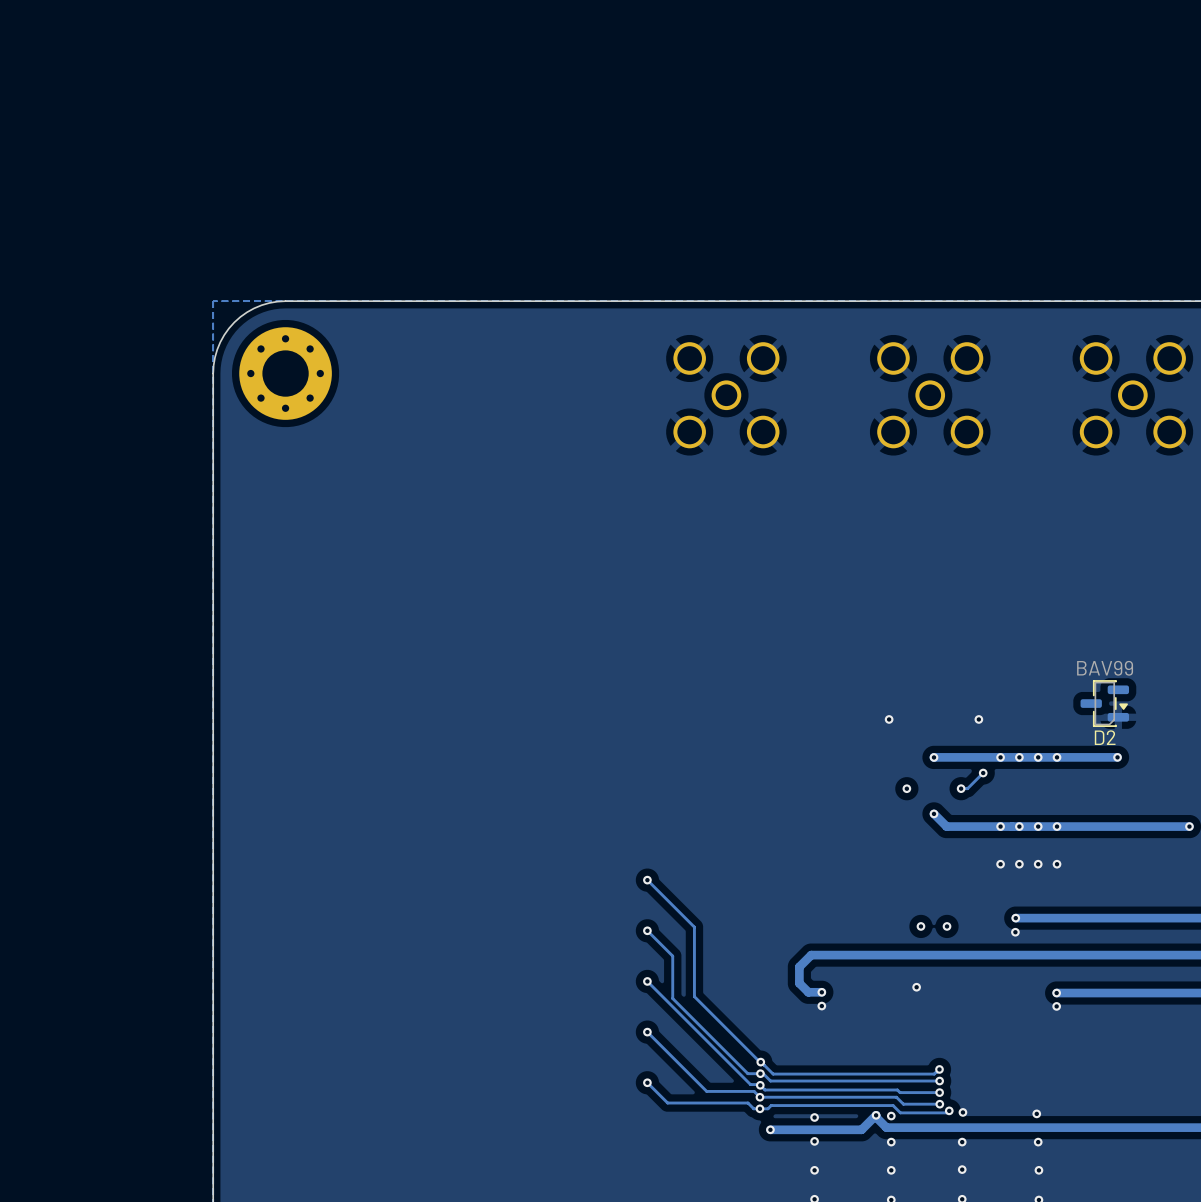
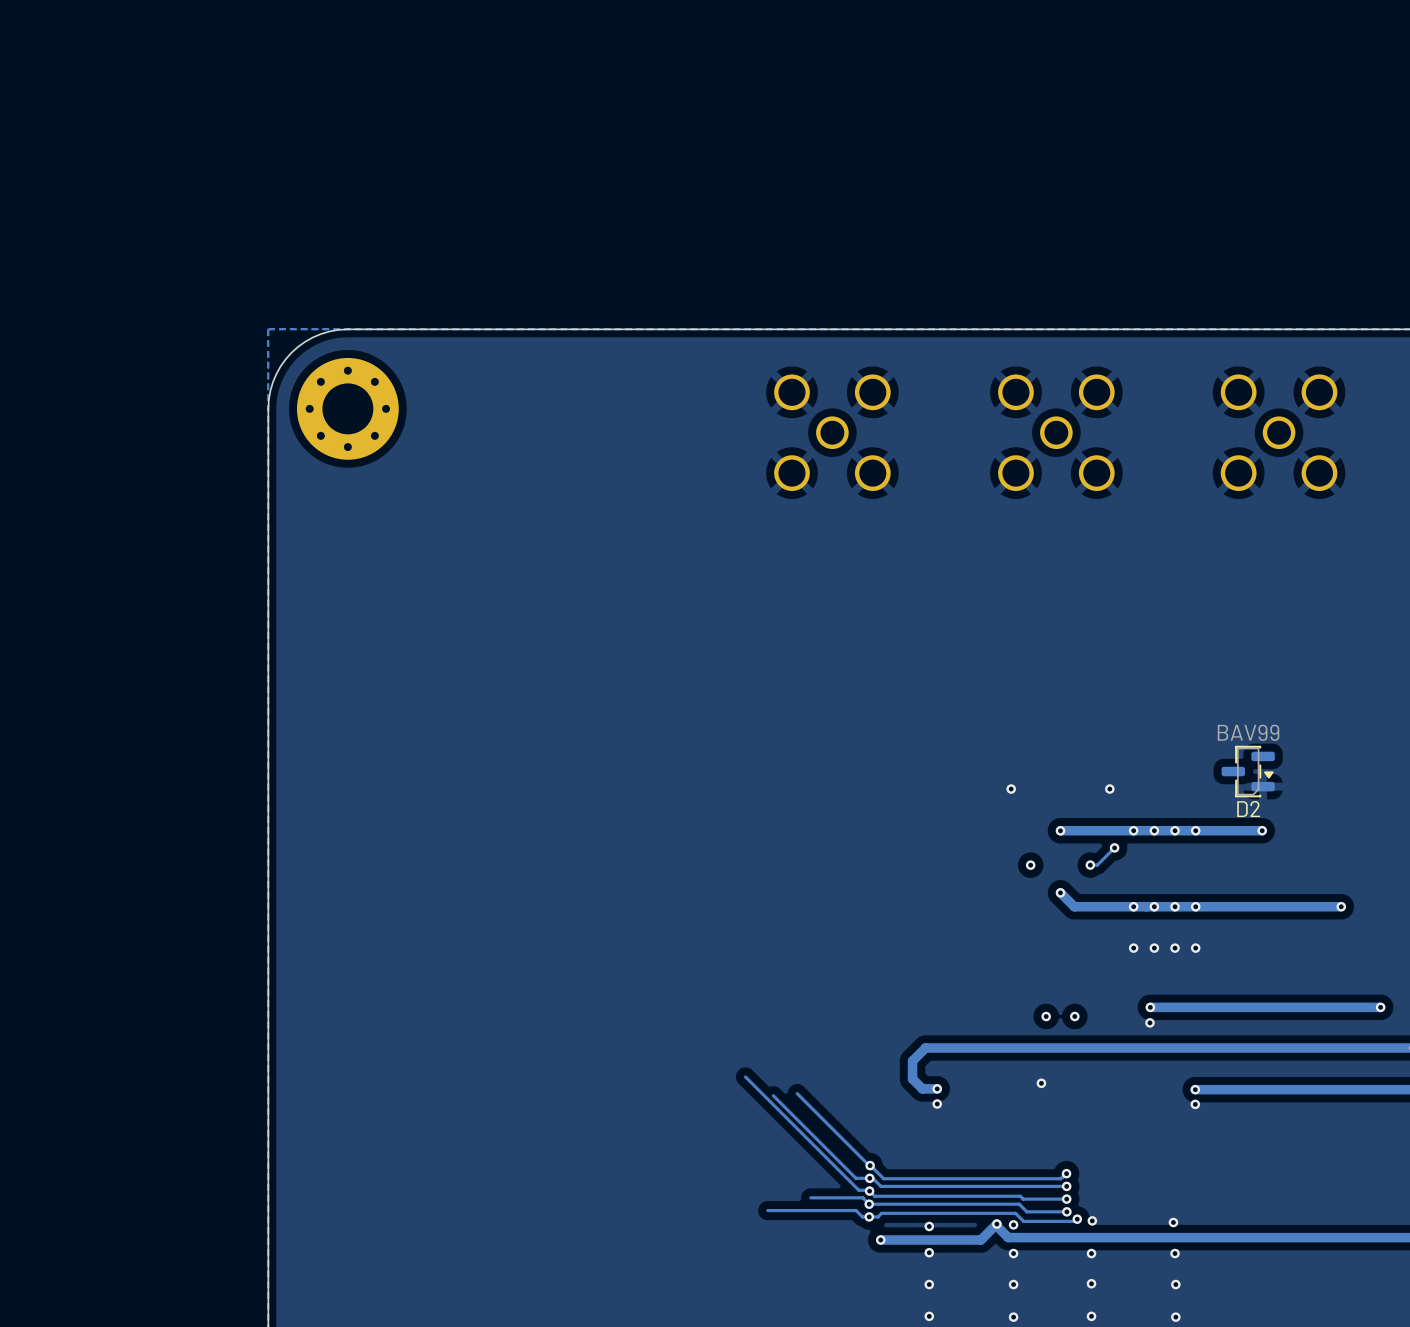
track: (647, 880) (694, 927) (694, 996) -> none
via: (647, 880) -> none
track: (647, 930) (672, 956) (672, 998) -> none
via: (647, 930) -> none
via: (647, 981) -> none
track: (647, 1032) (706, 1091) -> none
via: (647, 1032) -> none
track: (647, 1082) (667, 1103) -> none
via: (647, 1082) -> none

